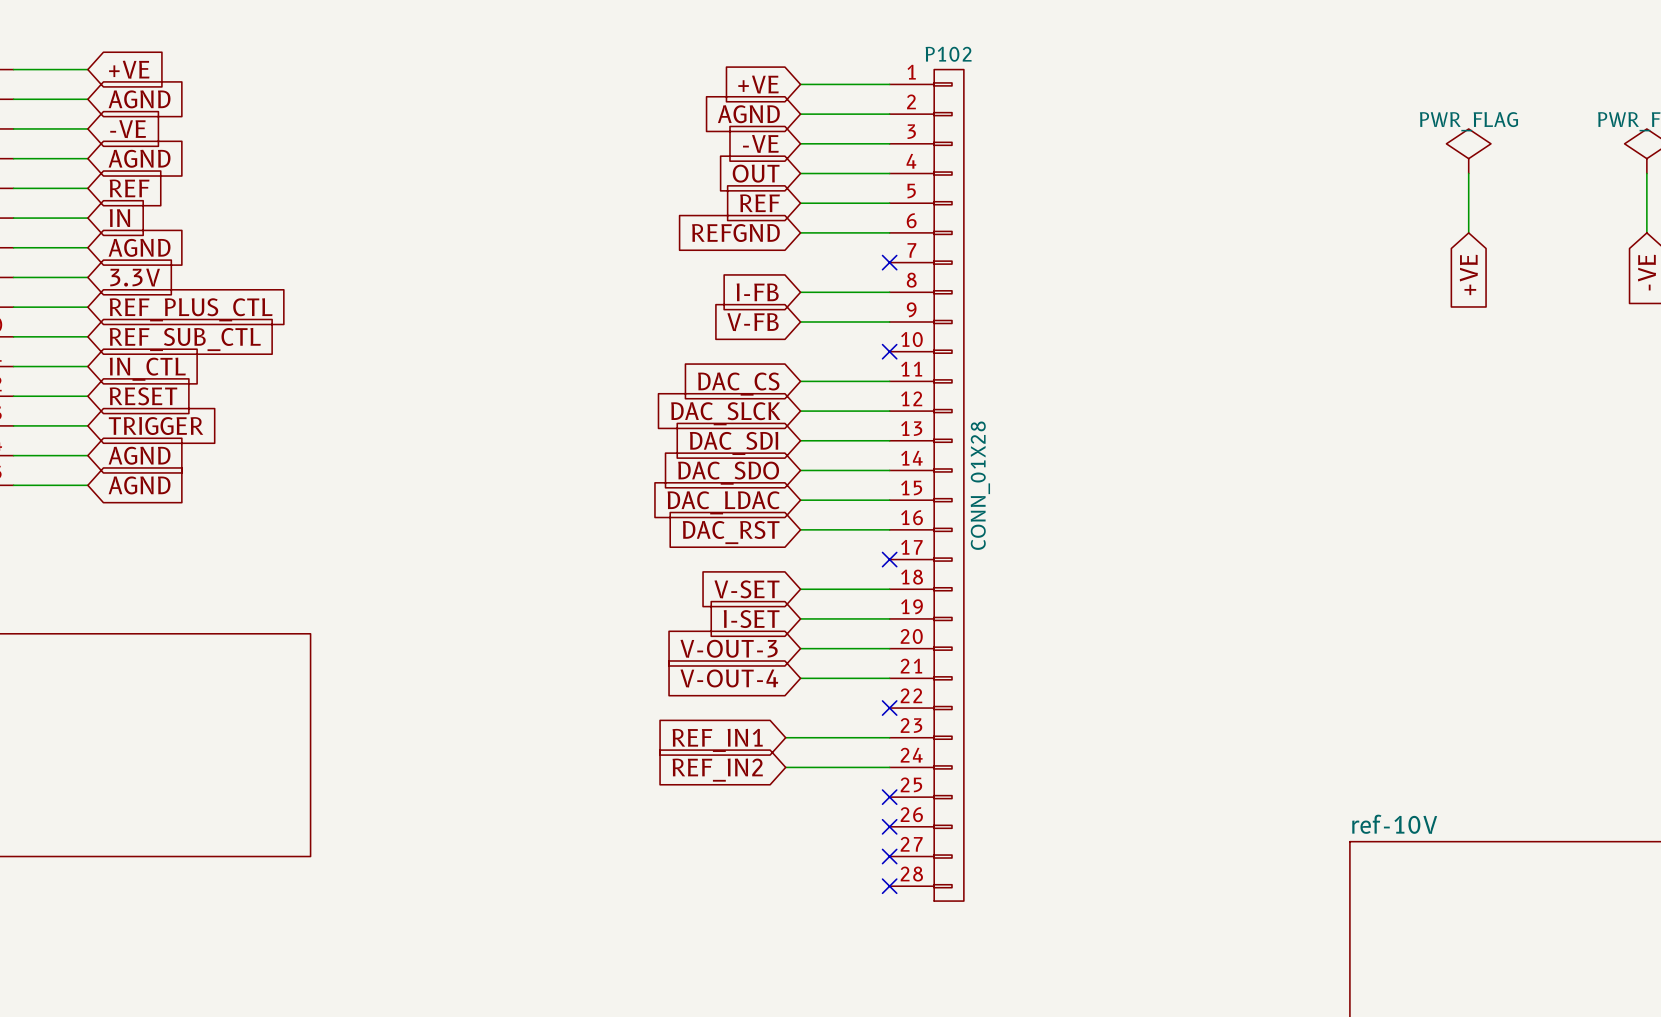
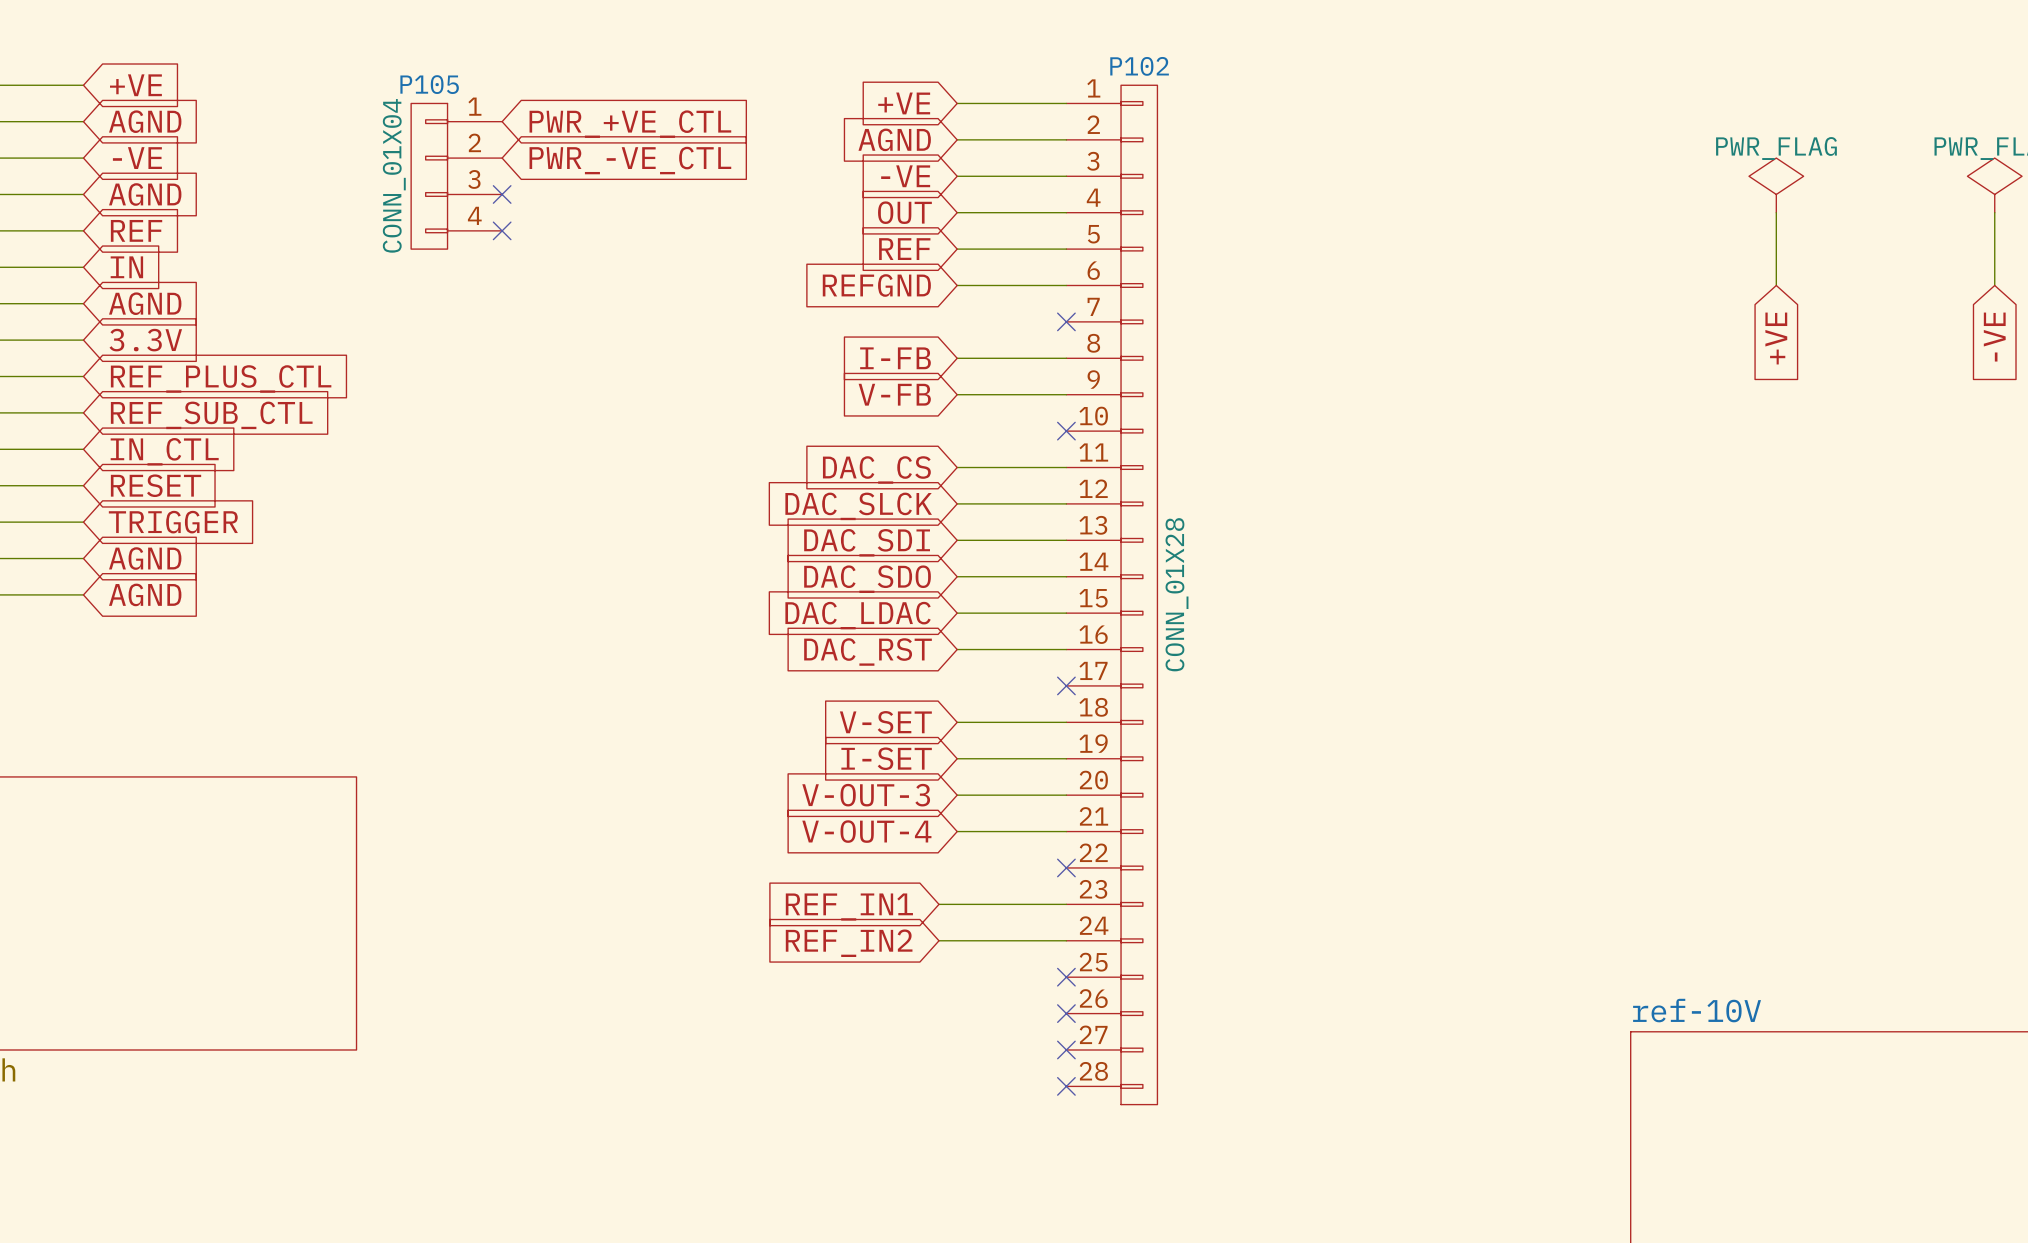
global label: none -> PWR_+VE_CTL (630, 124)
global label: none -> PWR_-VE_CTL (630, 160)
P105: none -> CONN_01X04 (456, 176)
no-connect mark: none -> (502, 194)
no-connect mark: none -> (502, 230)

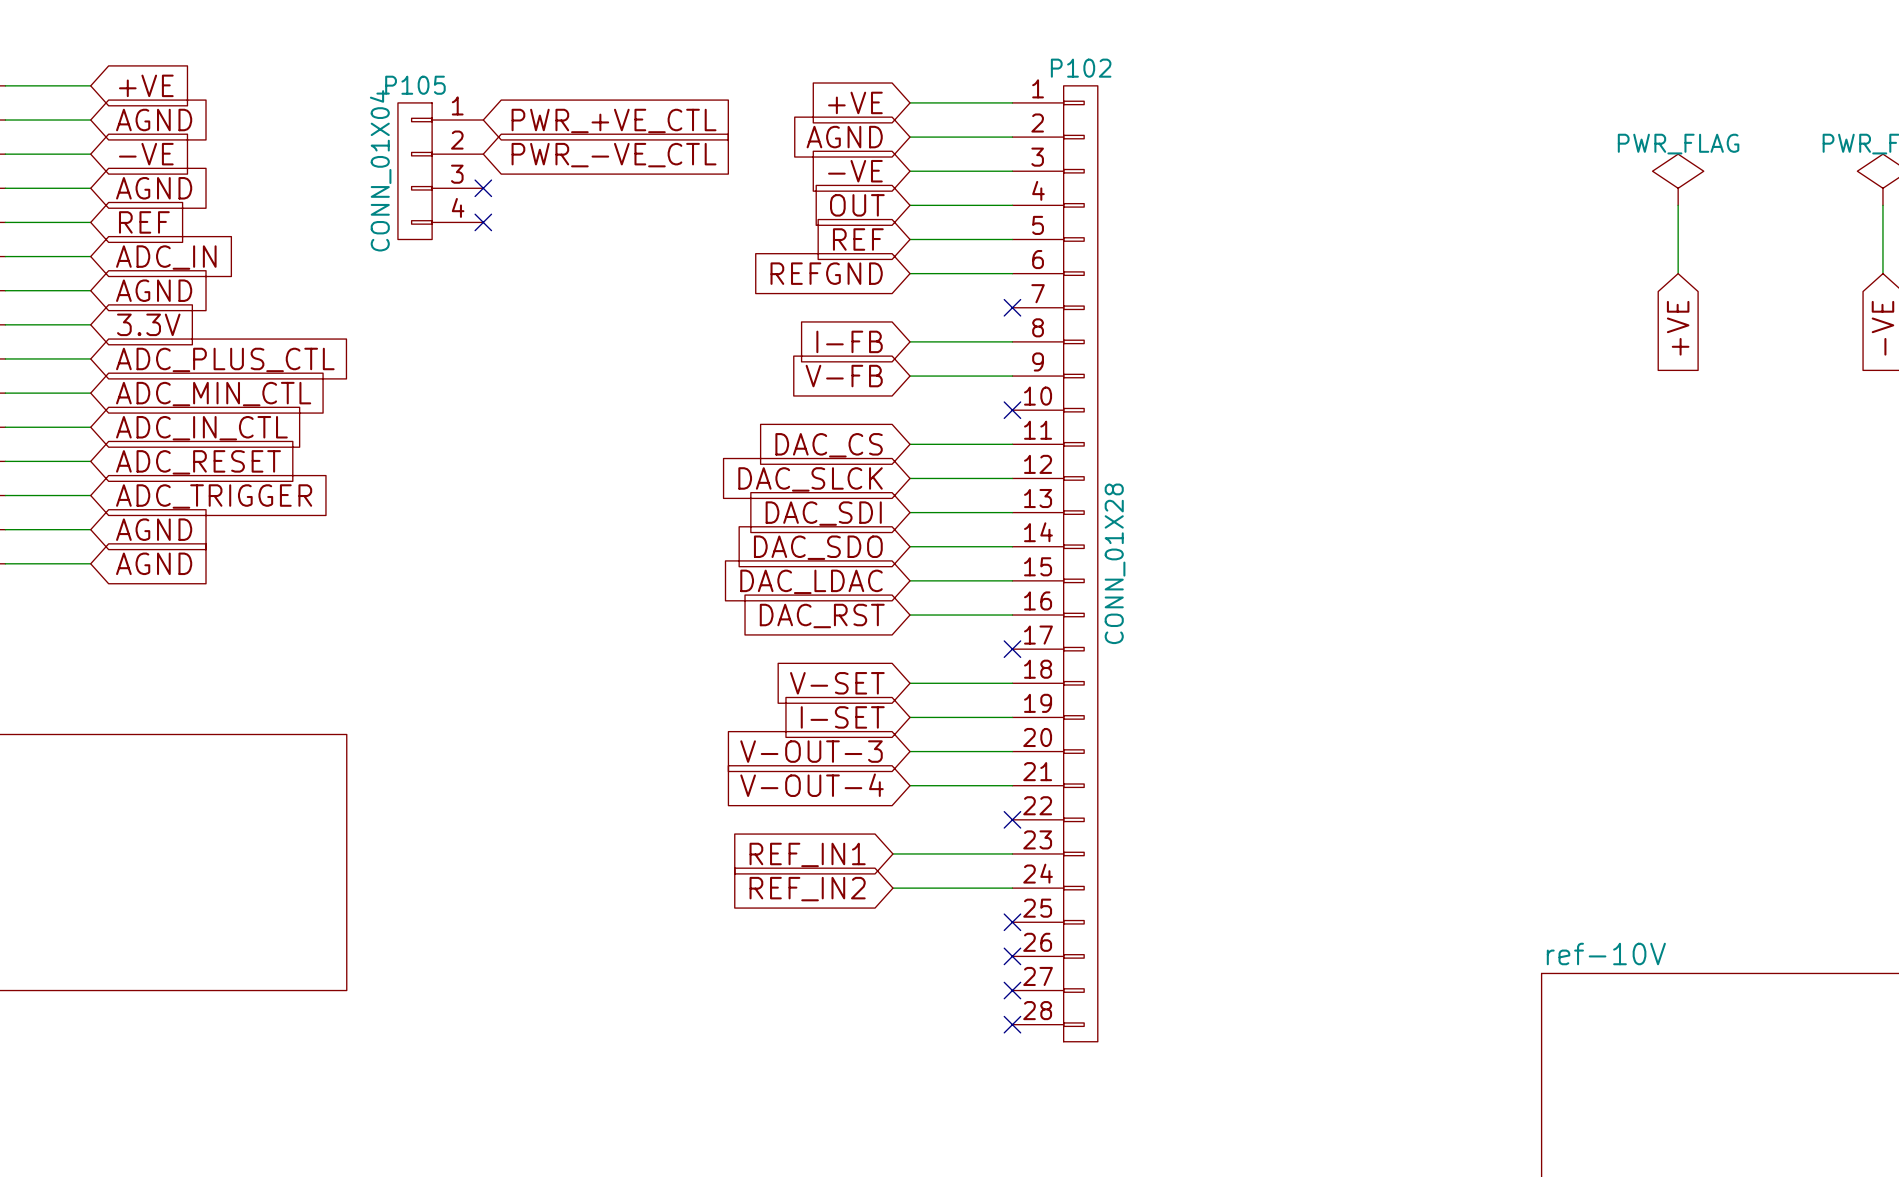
global label: IN (126, 267) -> ADC_IN (166, 257)
global label: REF_PLUS_CTL (221, 378) -> ADC_PLUS_CTL (225, 359)
global label: REF_SUB_CTL (211, 415) -> ADC_MIN_CTL (213, 394)
global label: IN_CTL (164, 451) -> ADC_IN_CTL (201, 428)
global label: RESET (156, 485) -> ADC_RESET (198, 462)
global label: TRIGGER (173, 522) -> ADC_TRIGGER (214, 496)

